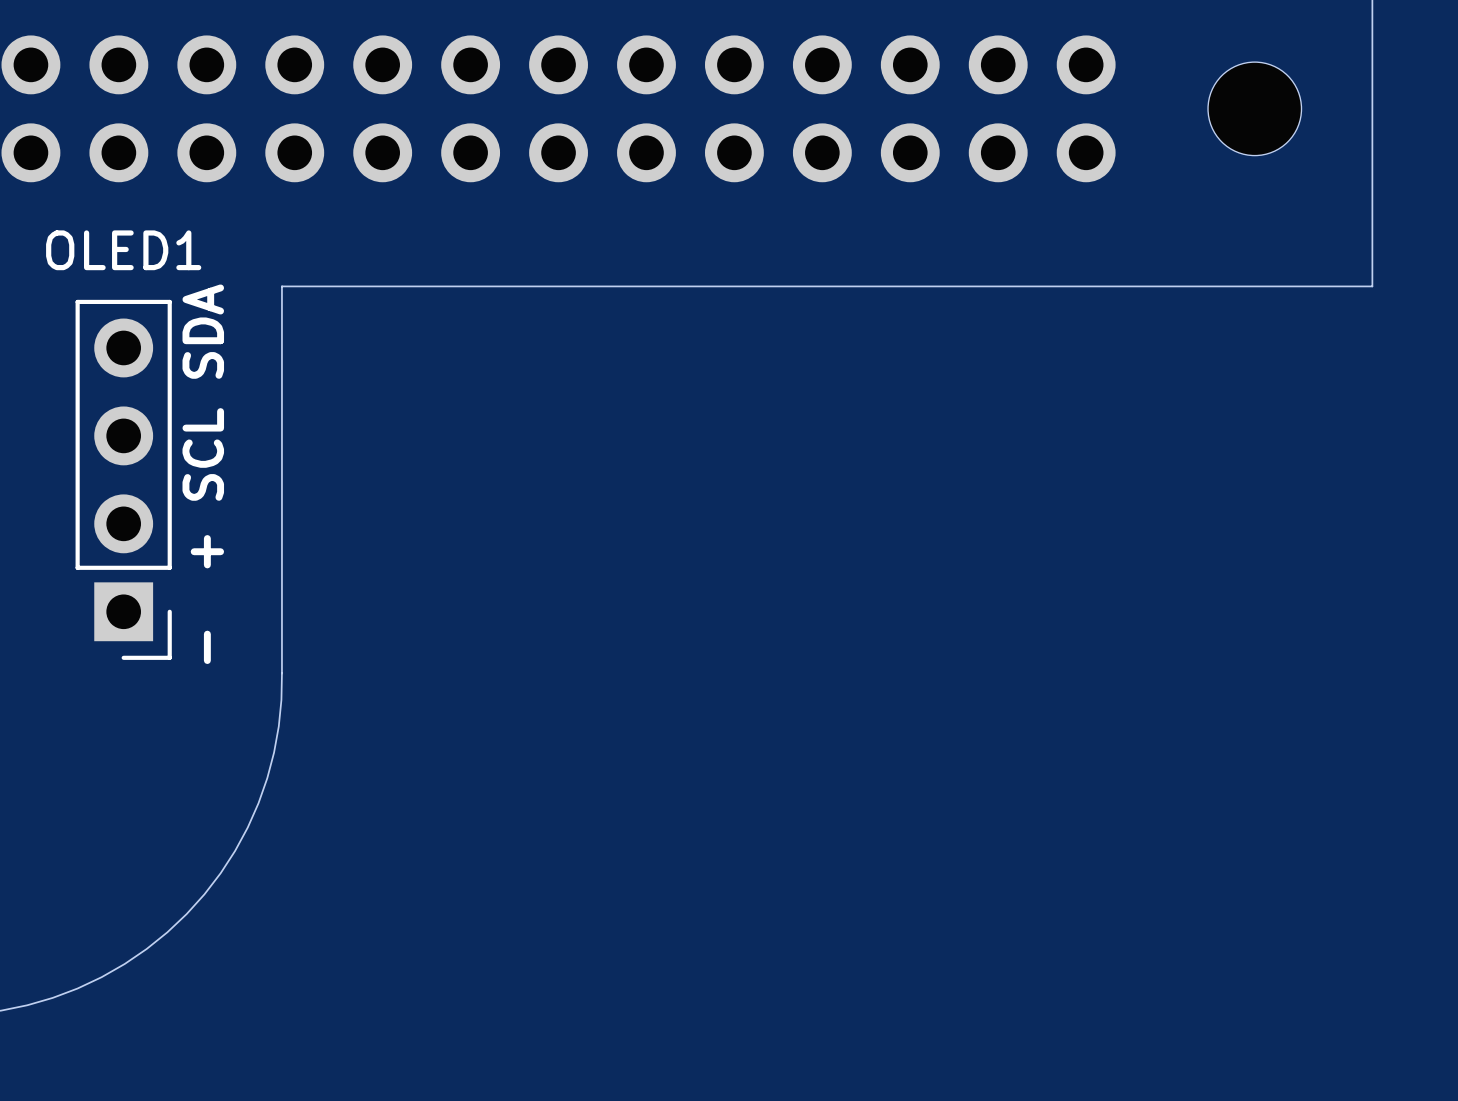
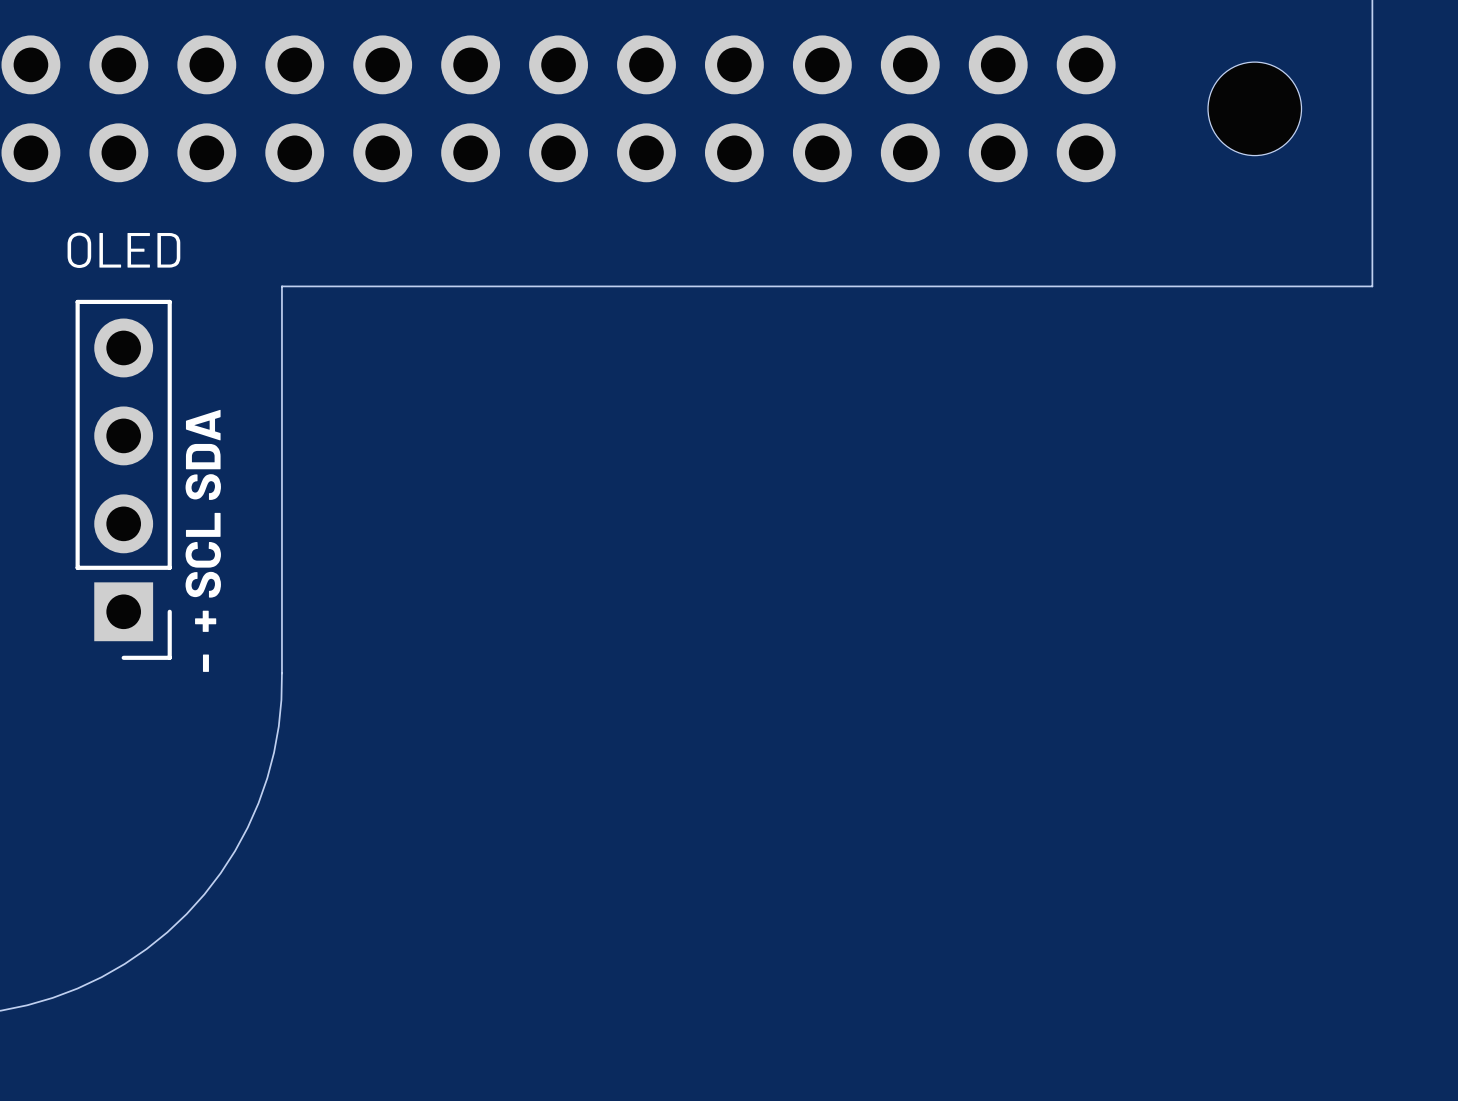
OLED1 name: OLED1 (123, 250) -> OLED (123, 250)

